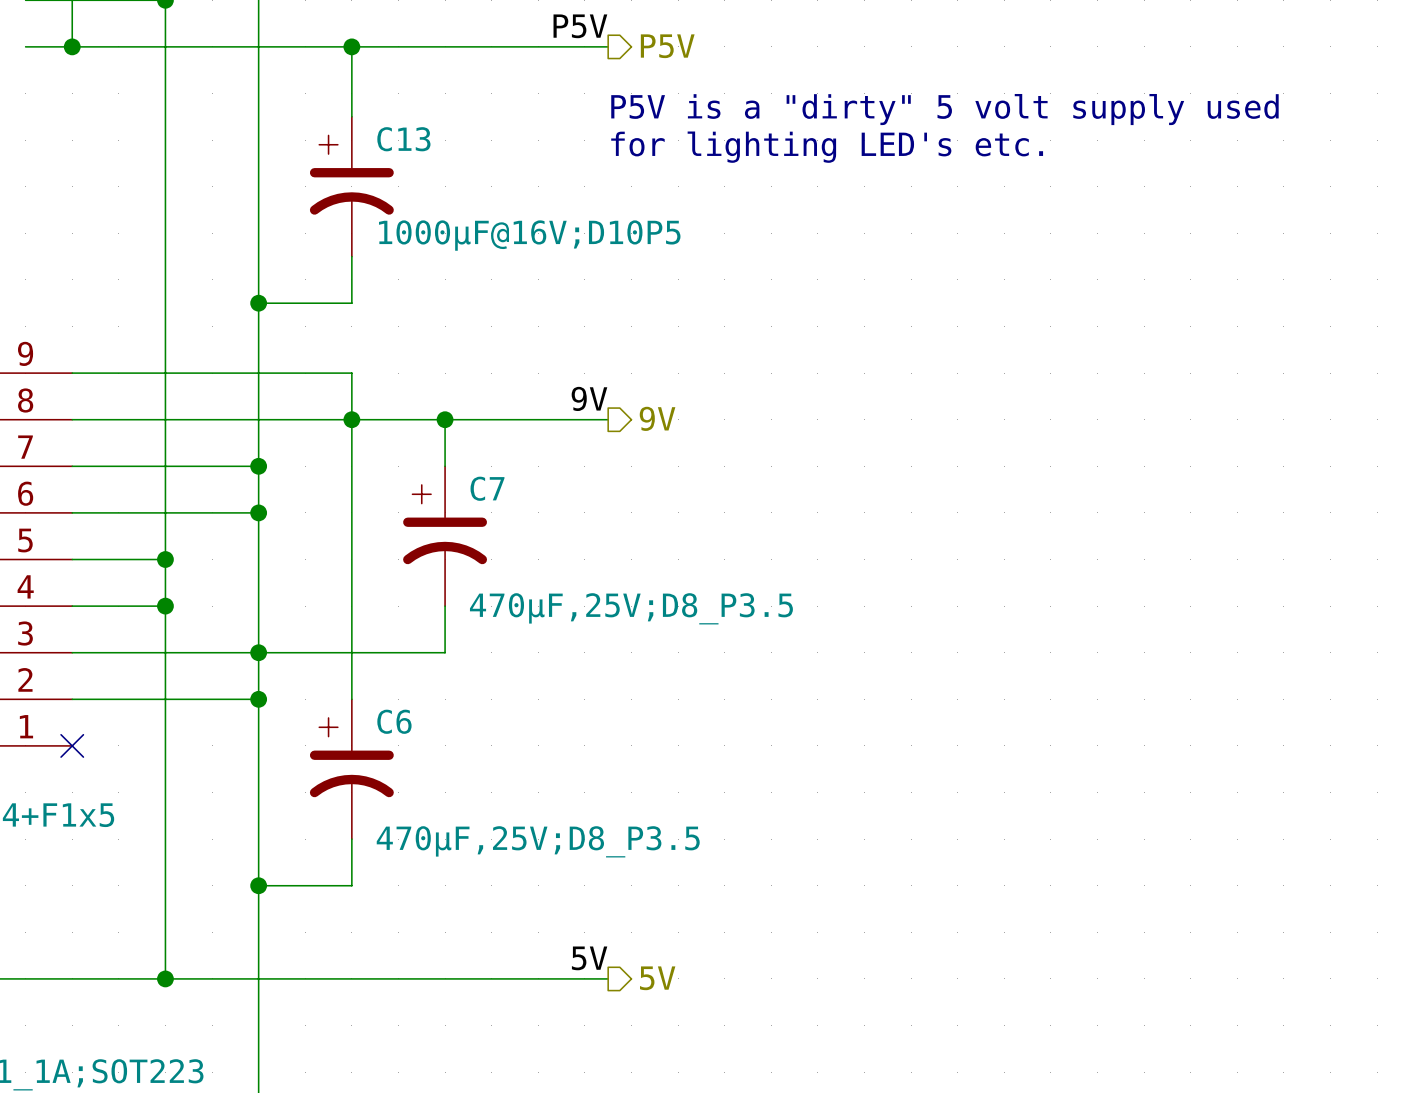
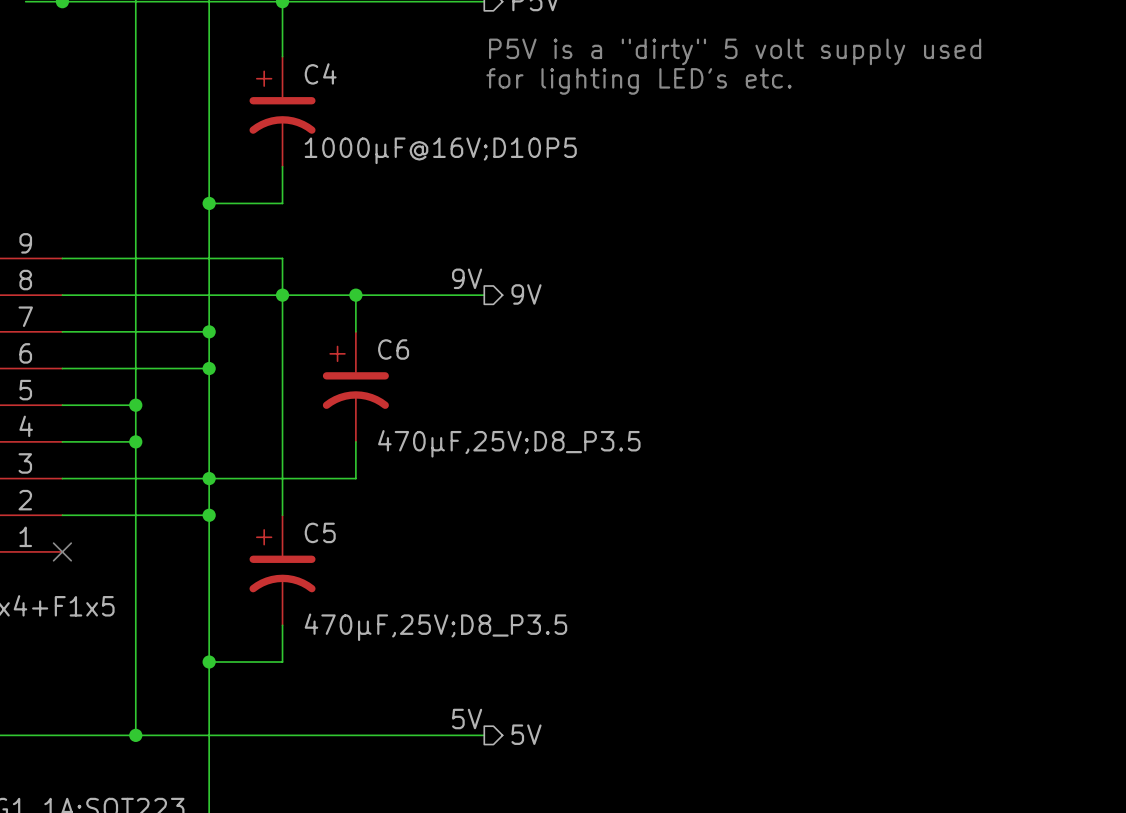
C13 name: C13 (403, 139) -> C4 (320, 73)
C7 name: C7 (487, 488) -> C6 (393, 349)
C6 name: C6 (394, 721) -> C5 (320, 532)

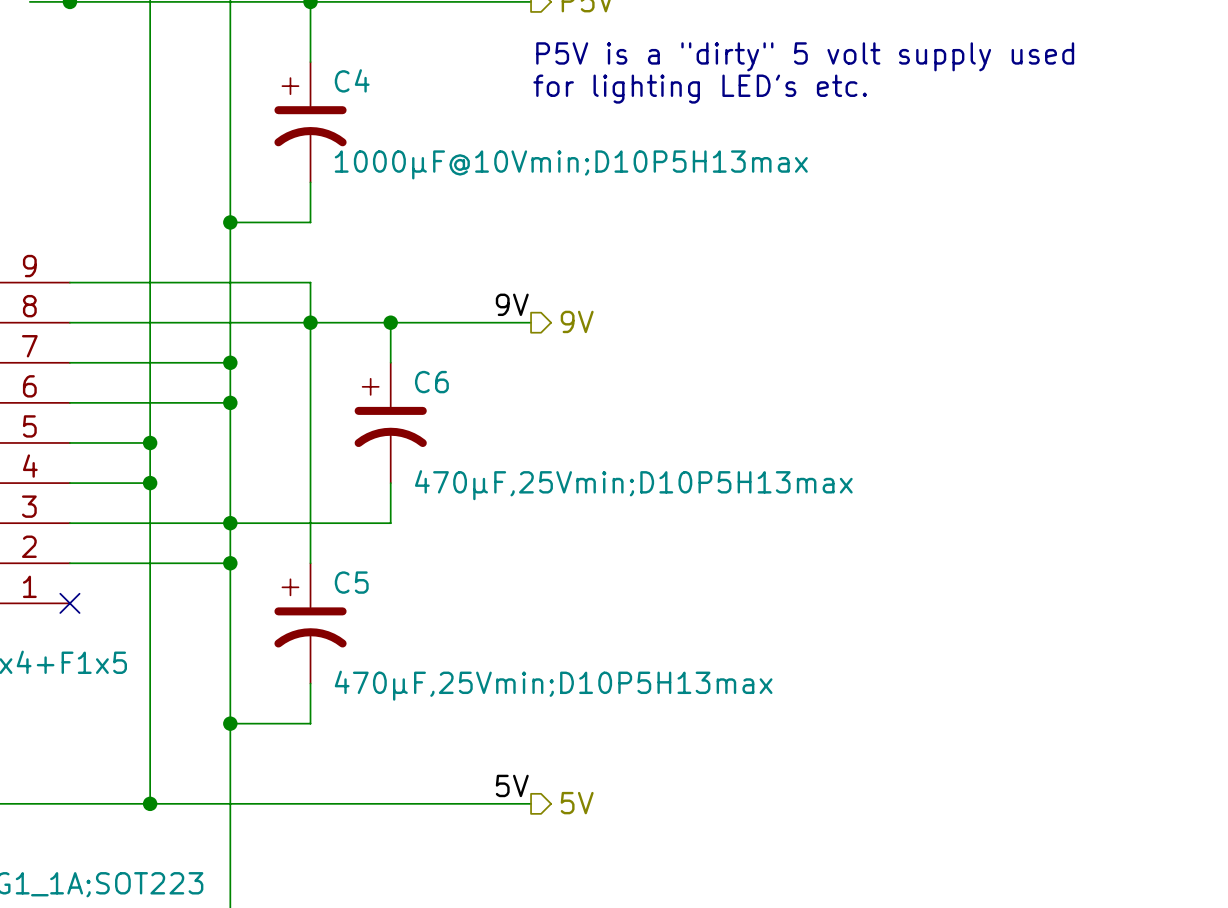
C4 value: 1000µF@16V;D10P5 (440, 150) -> 1000µF@10Vmin;D10P5H13max (571, 164)
C6 value: 470µF,25V;D8_P3.5 (509, 443) -> 470µF,25Vmin;D10P5H13max (633, 485)
C5 value: 470µF,25V;D8_P3.5 (435, 627) -> 470µF,25Vmin;D10P5H13max (553, 685)

